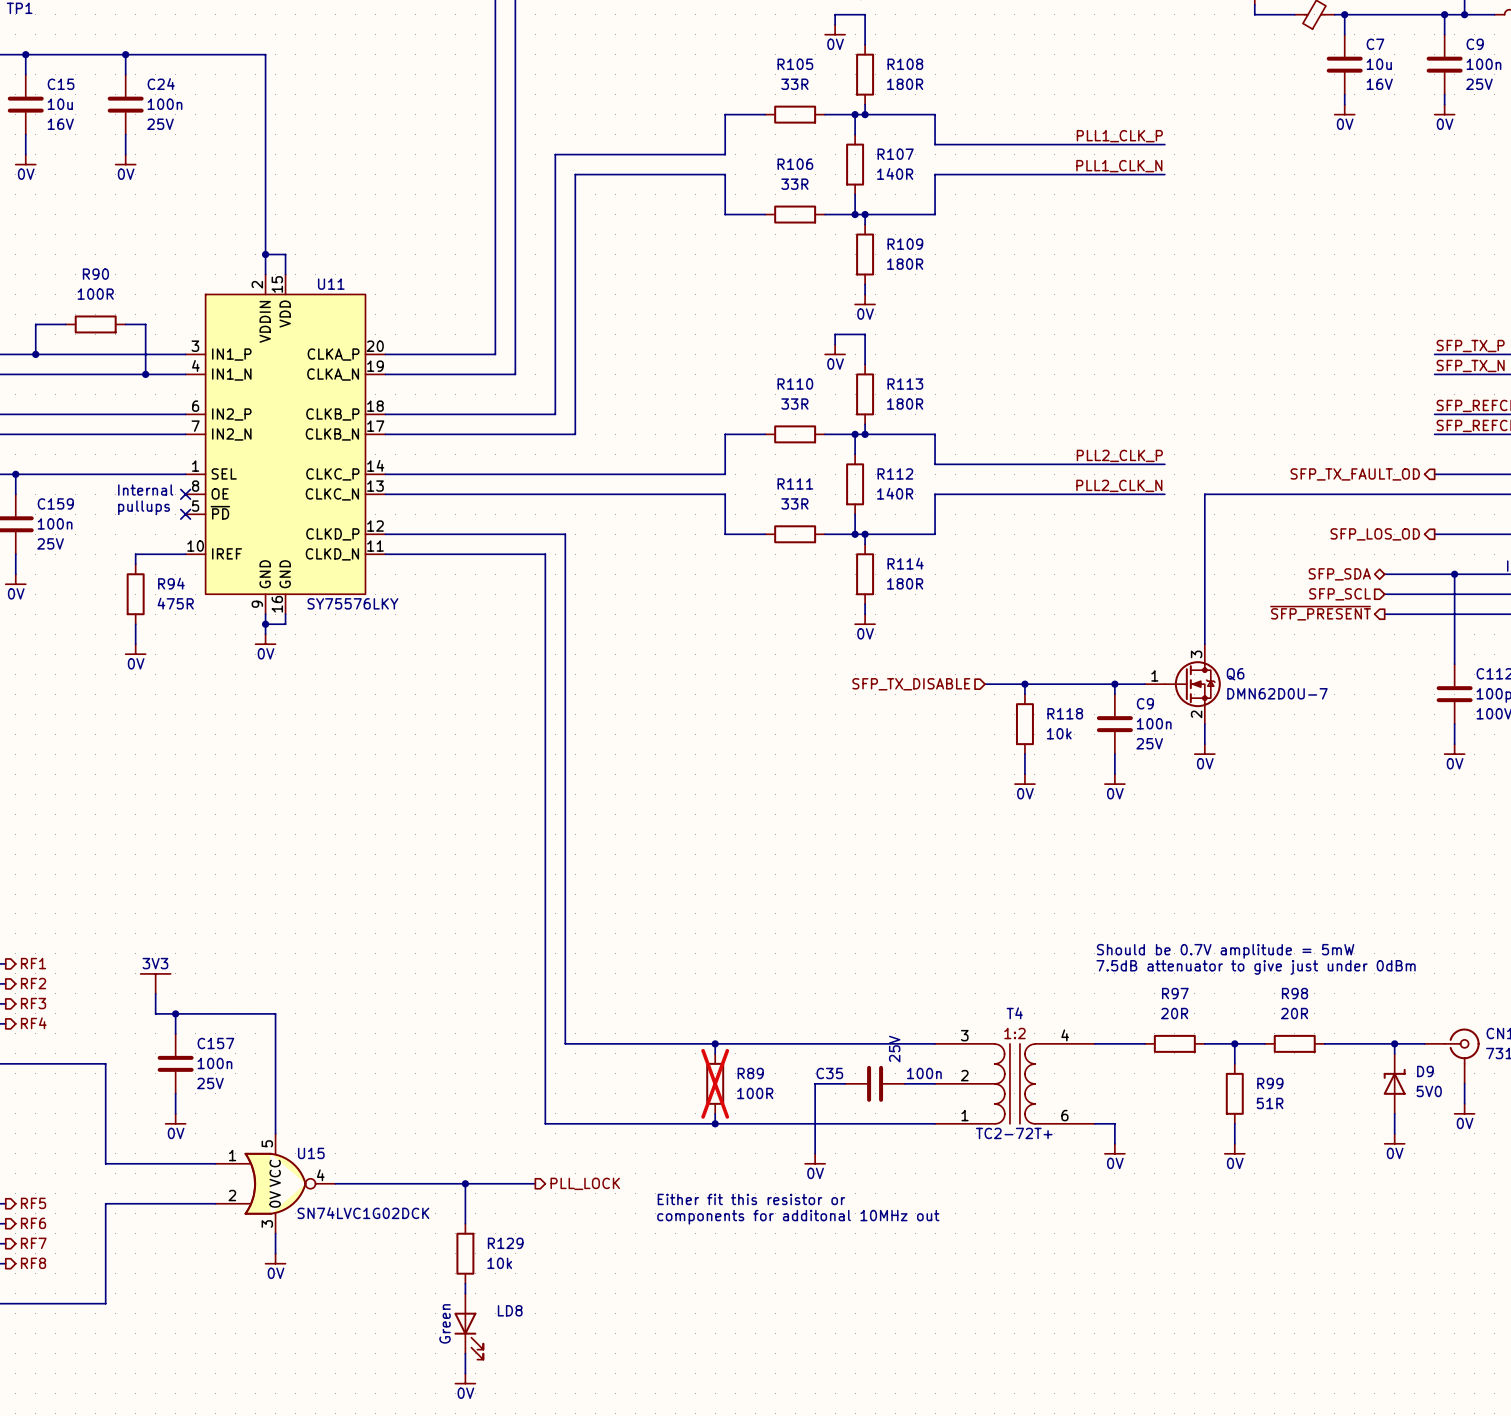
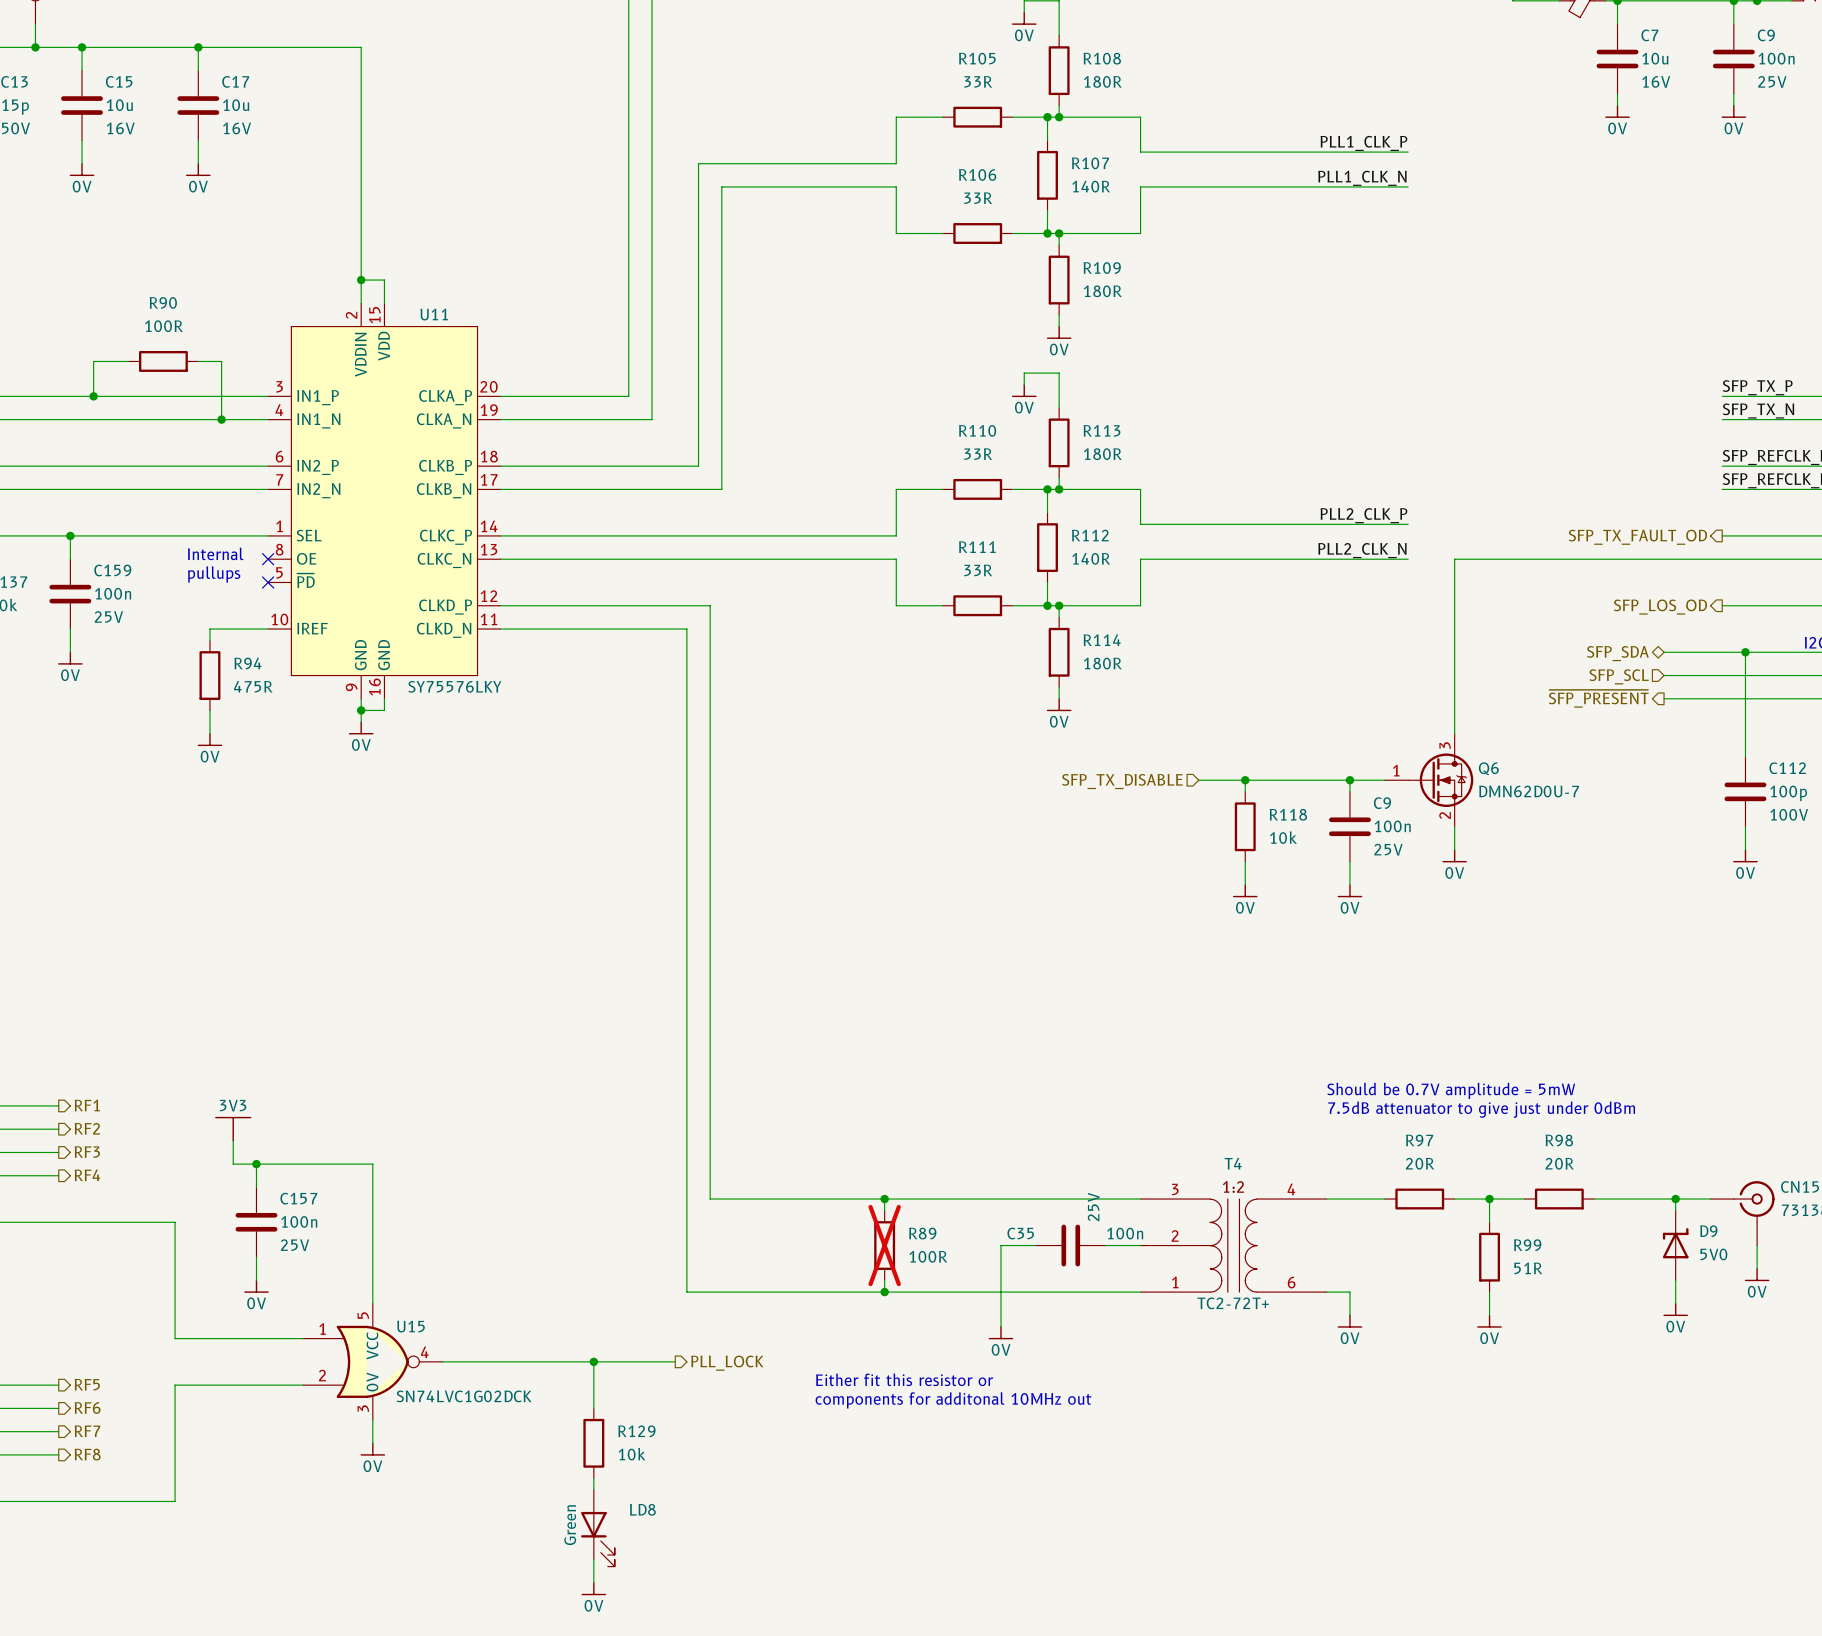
C24 name: C24 (161, 84) -> C17 (235, 81)
C24 value: 100n (165, 104) -> 10u (236, 105)
C24 text: 25V (160, 124) -> 16V (237, 128)

